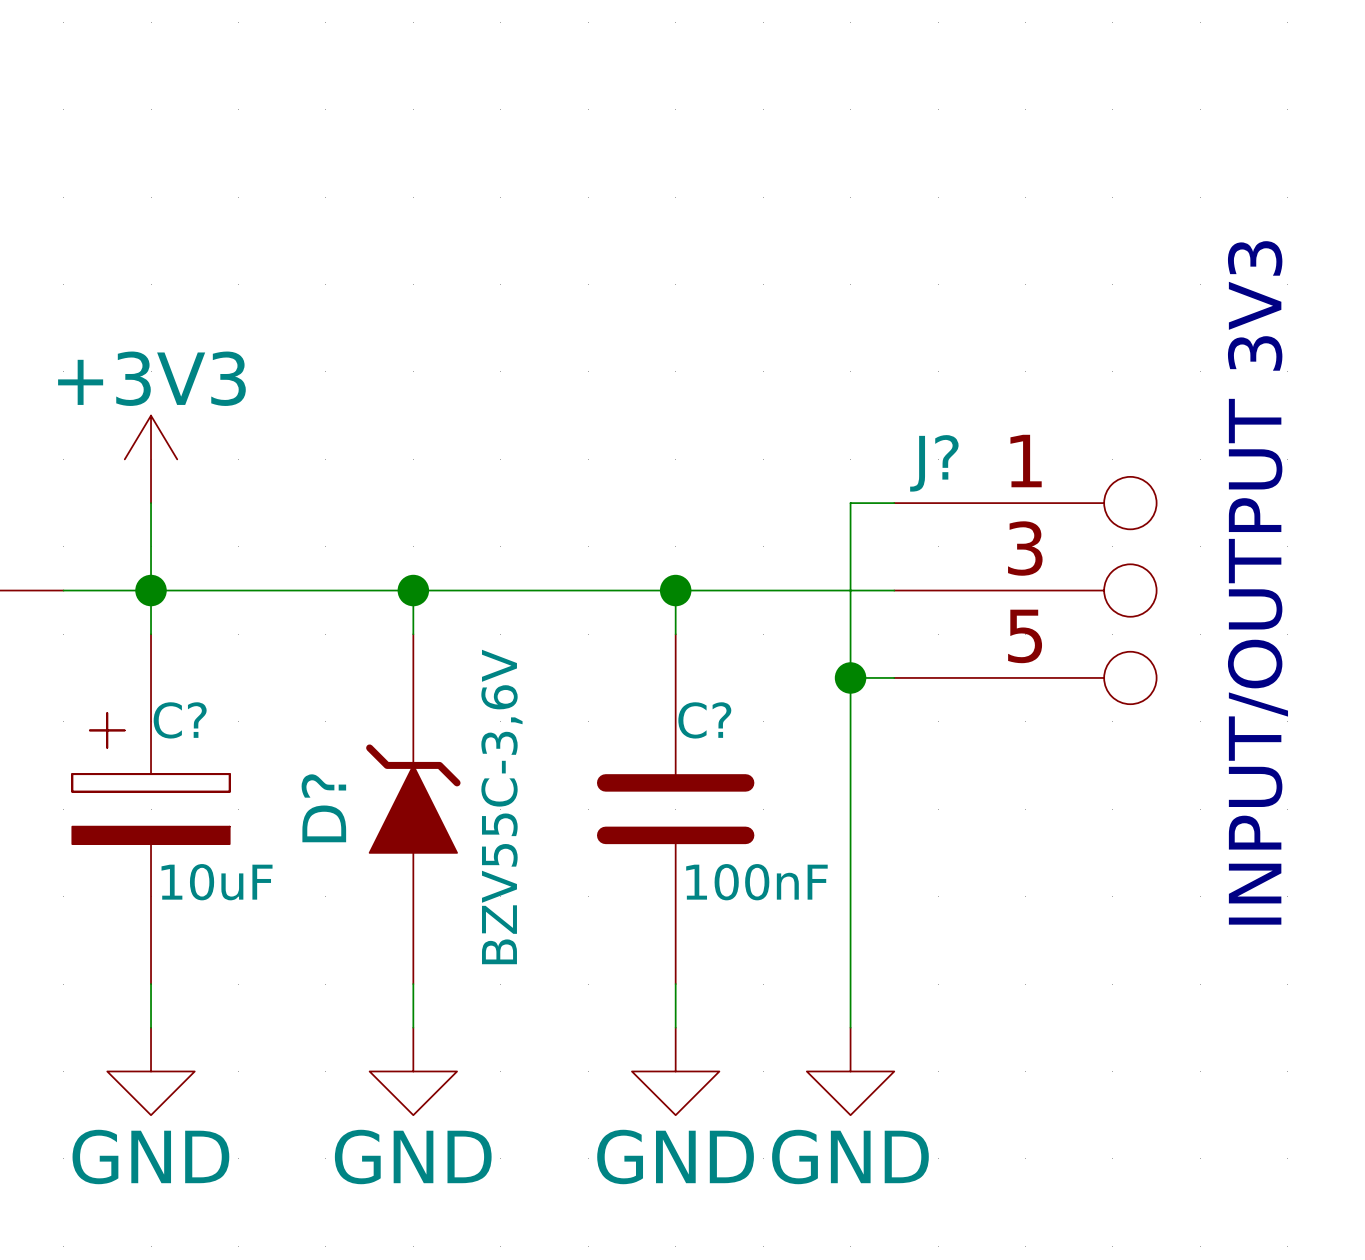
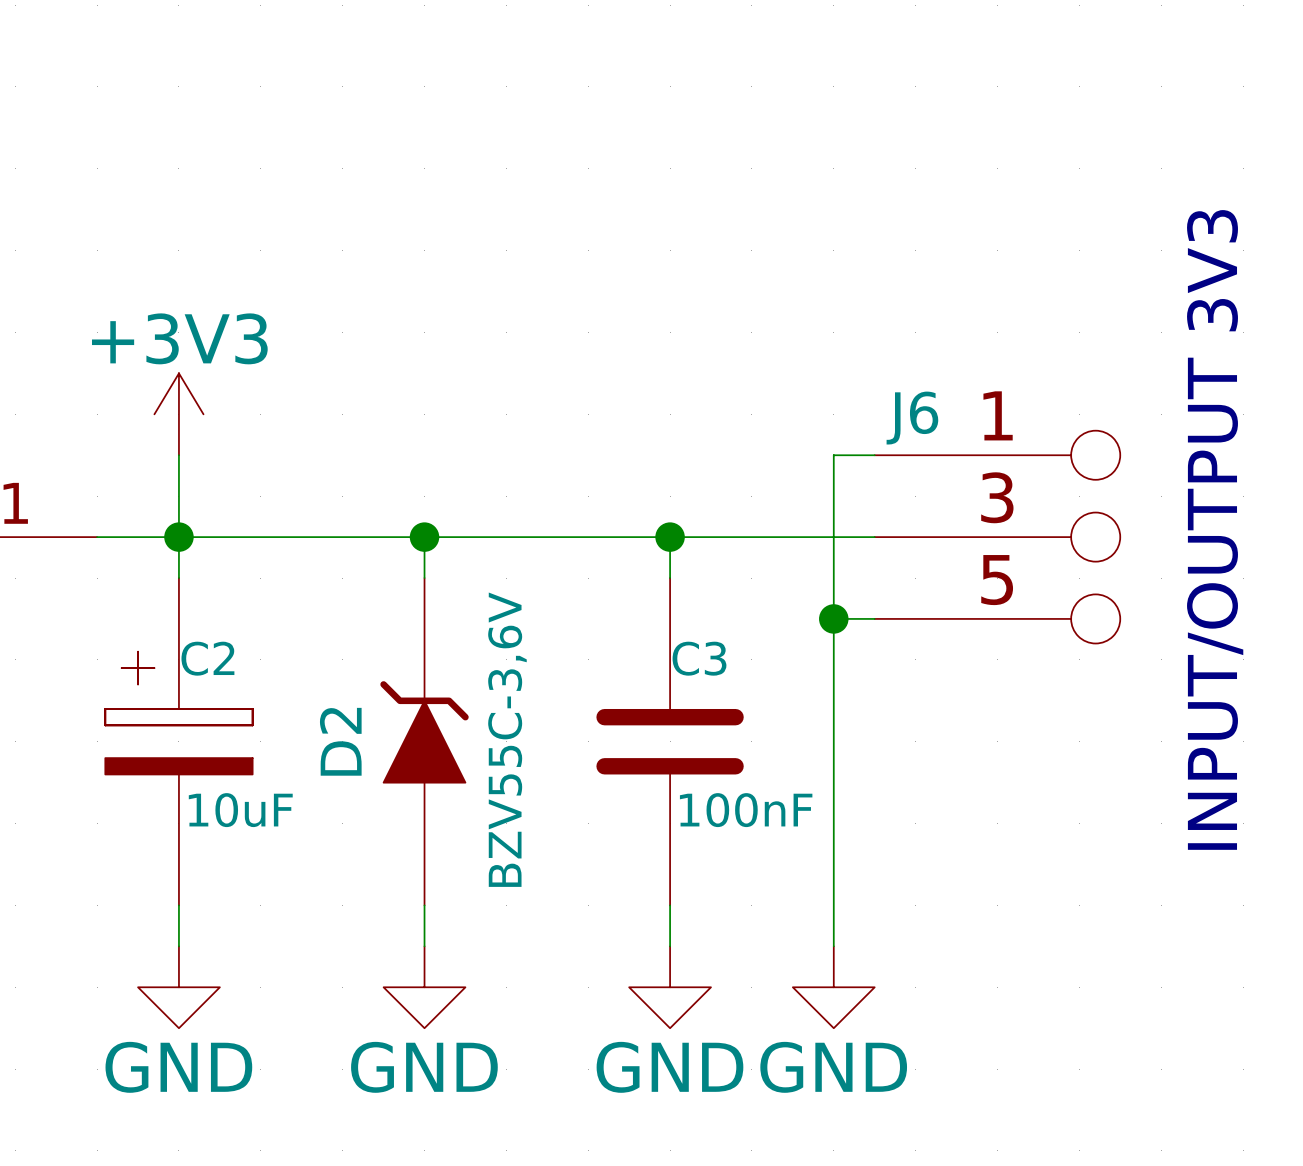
J? name: J? (934, 463) -> J6 (912, 418)
C? name: C? (180, 720) -> C2 (207, 658)
C? name: C? (704, 720) -> C3 (699, 658)
D? name: D? (323, 808) -> D2 (340, 741)

